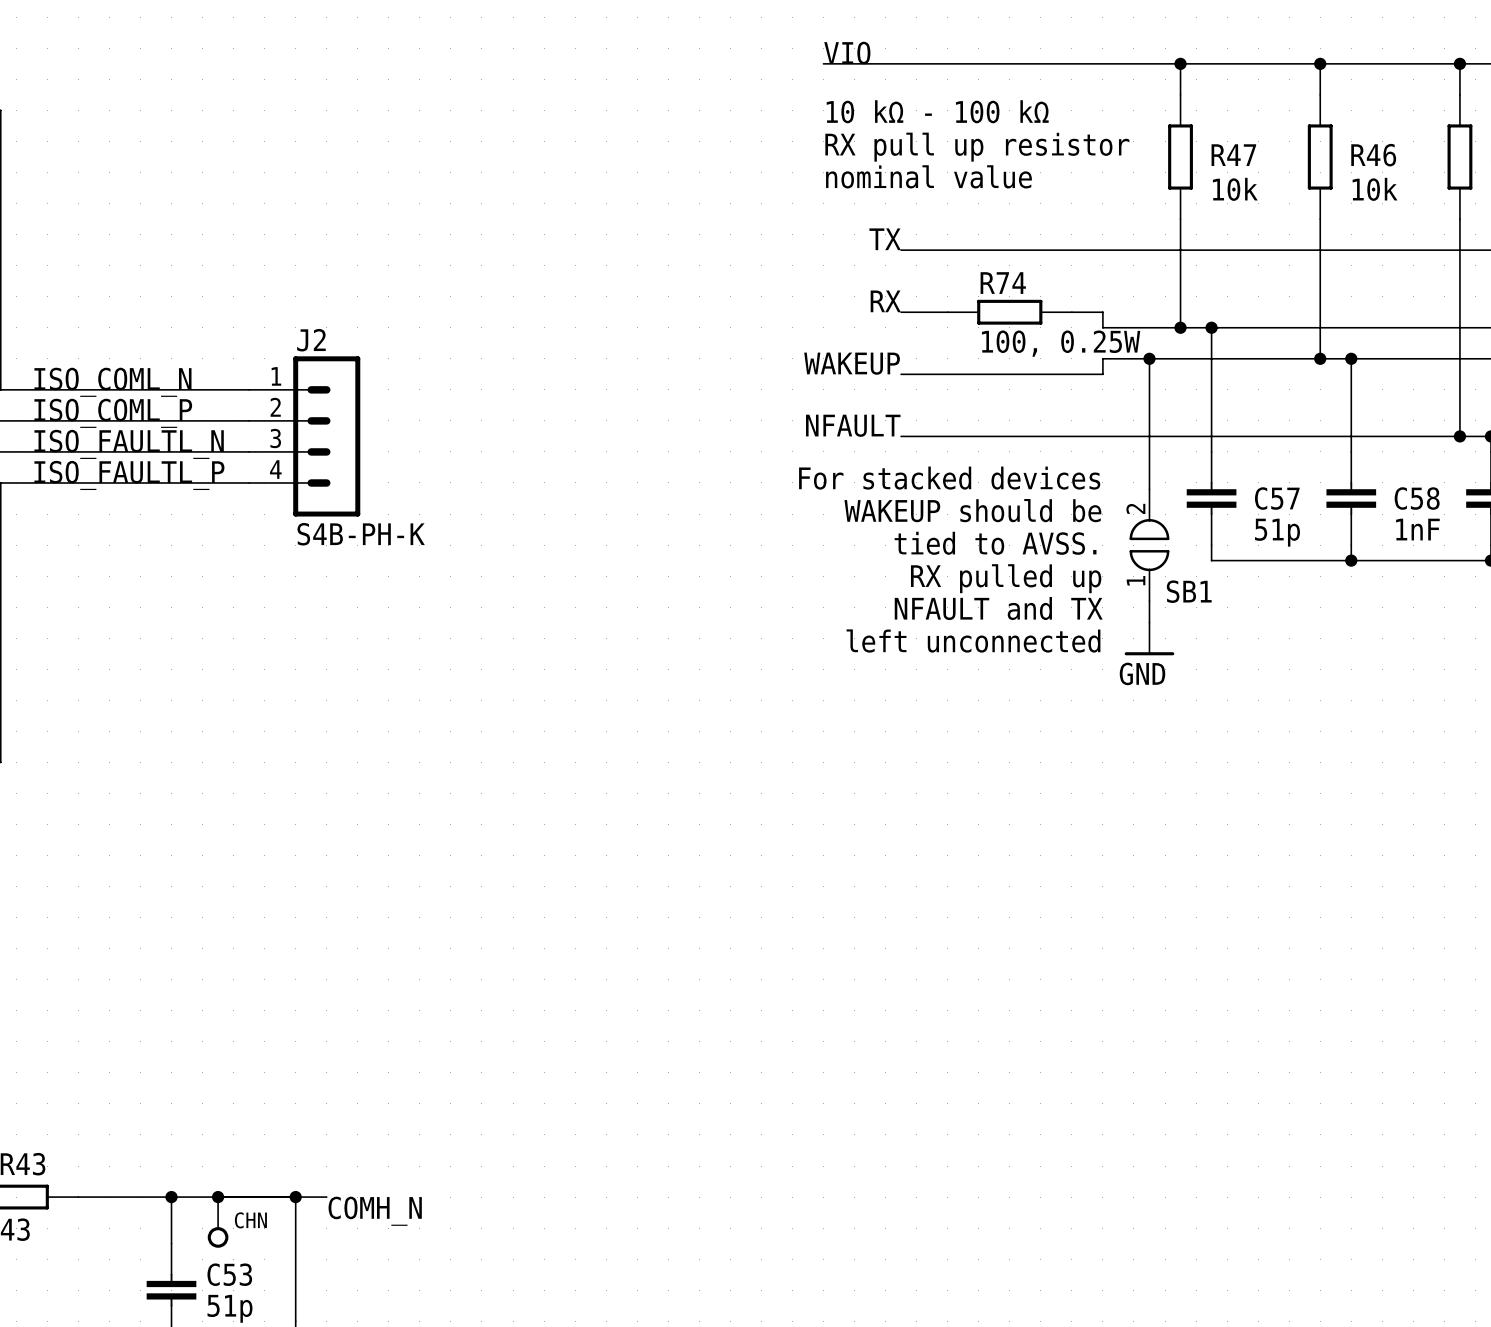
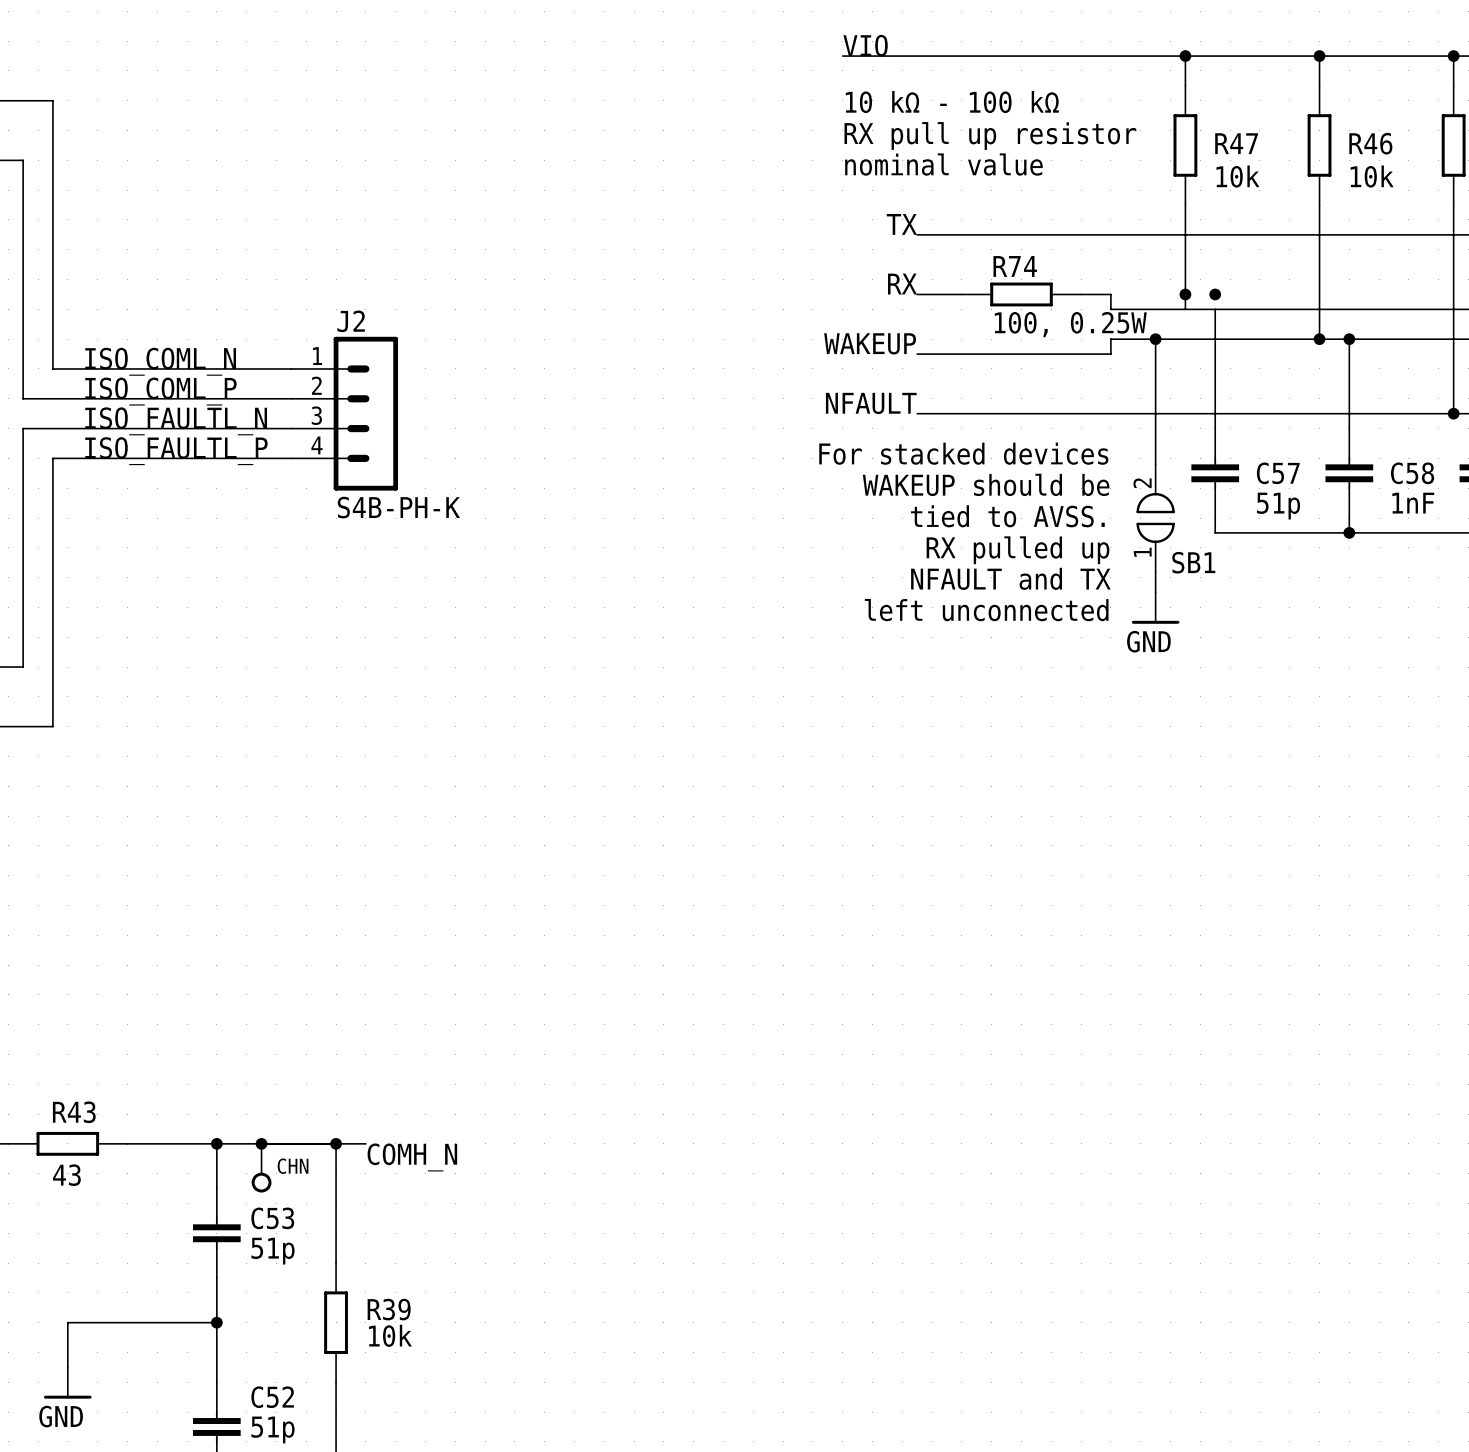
junction position: (1180, 327) -> (1185, 294)
junction position: (1211, 327) -> (1215, 294)

